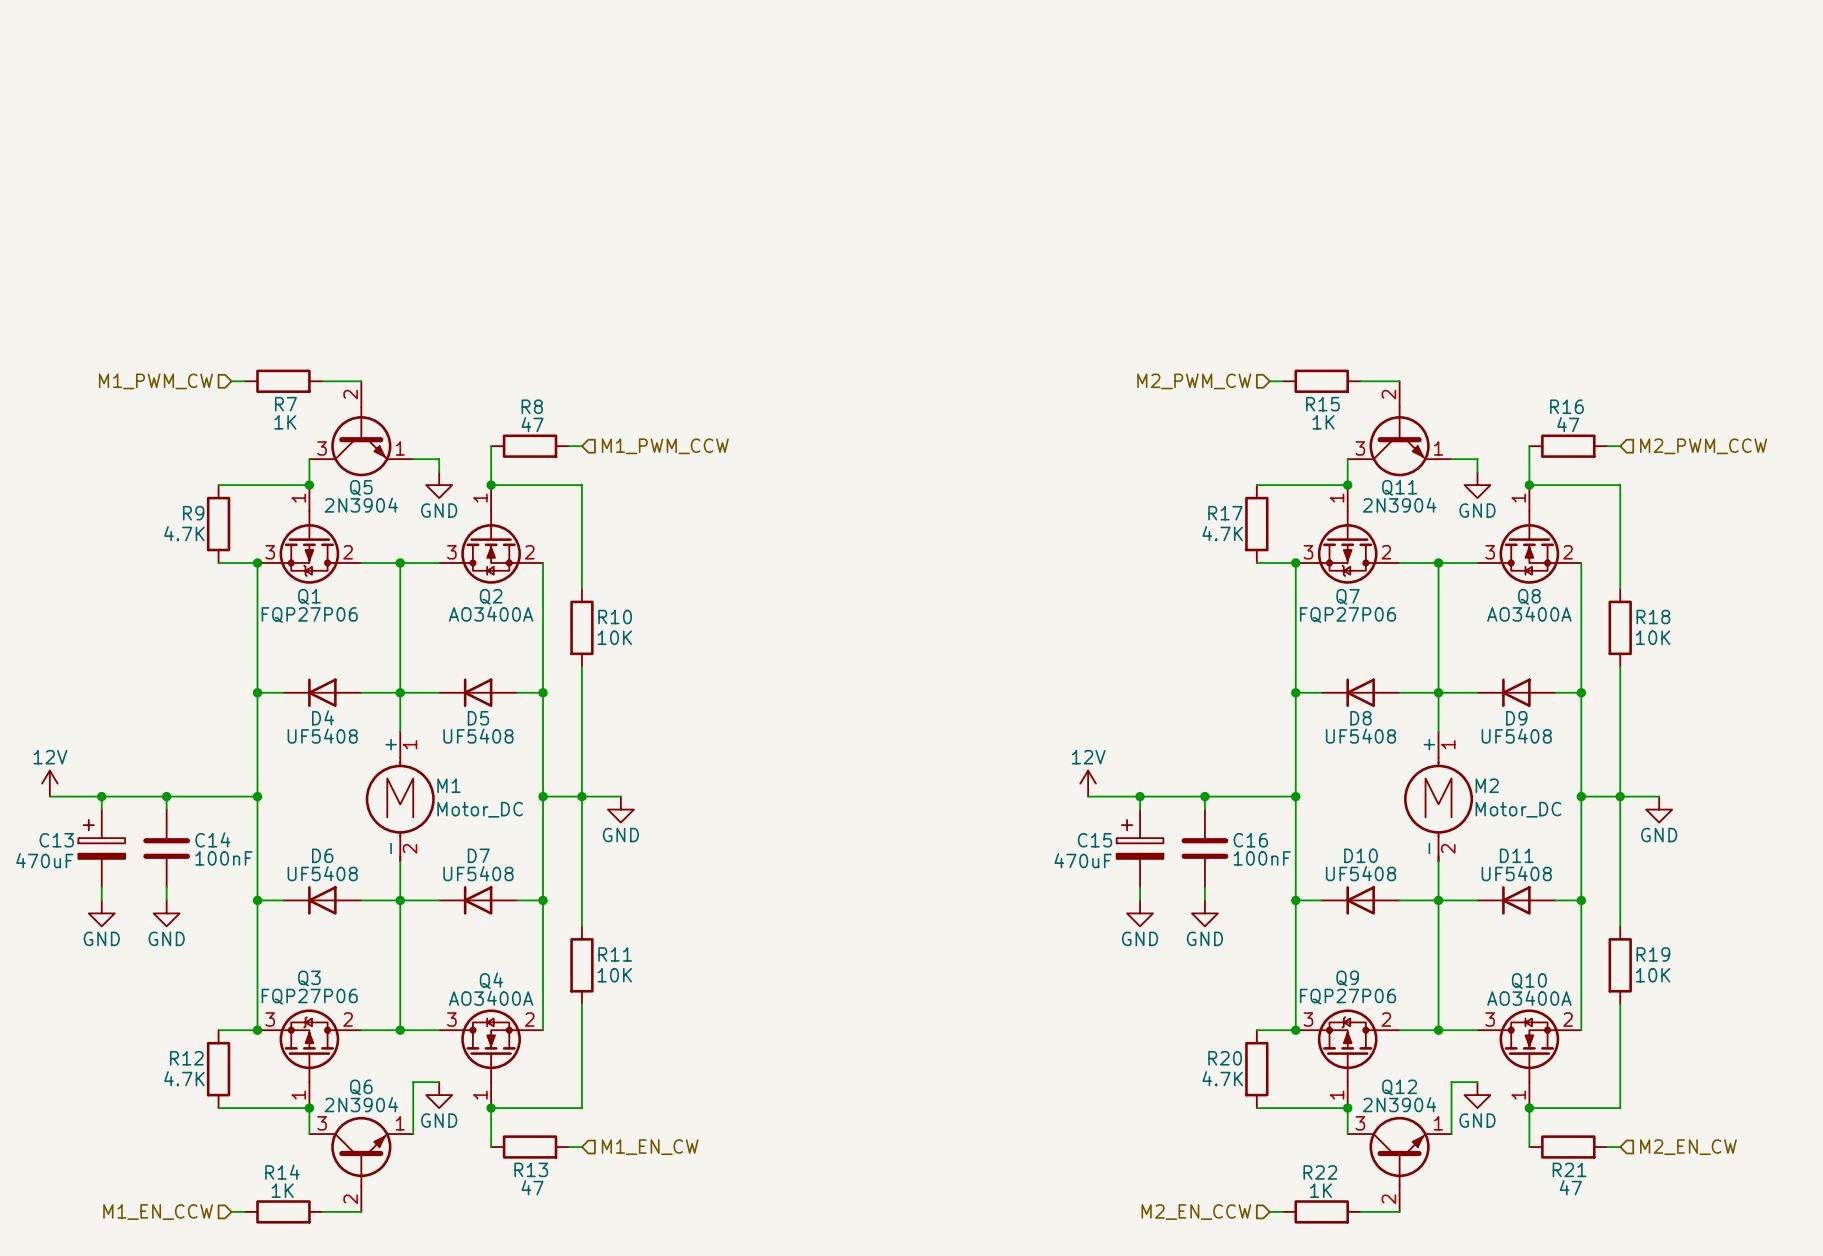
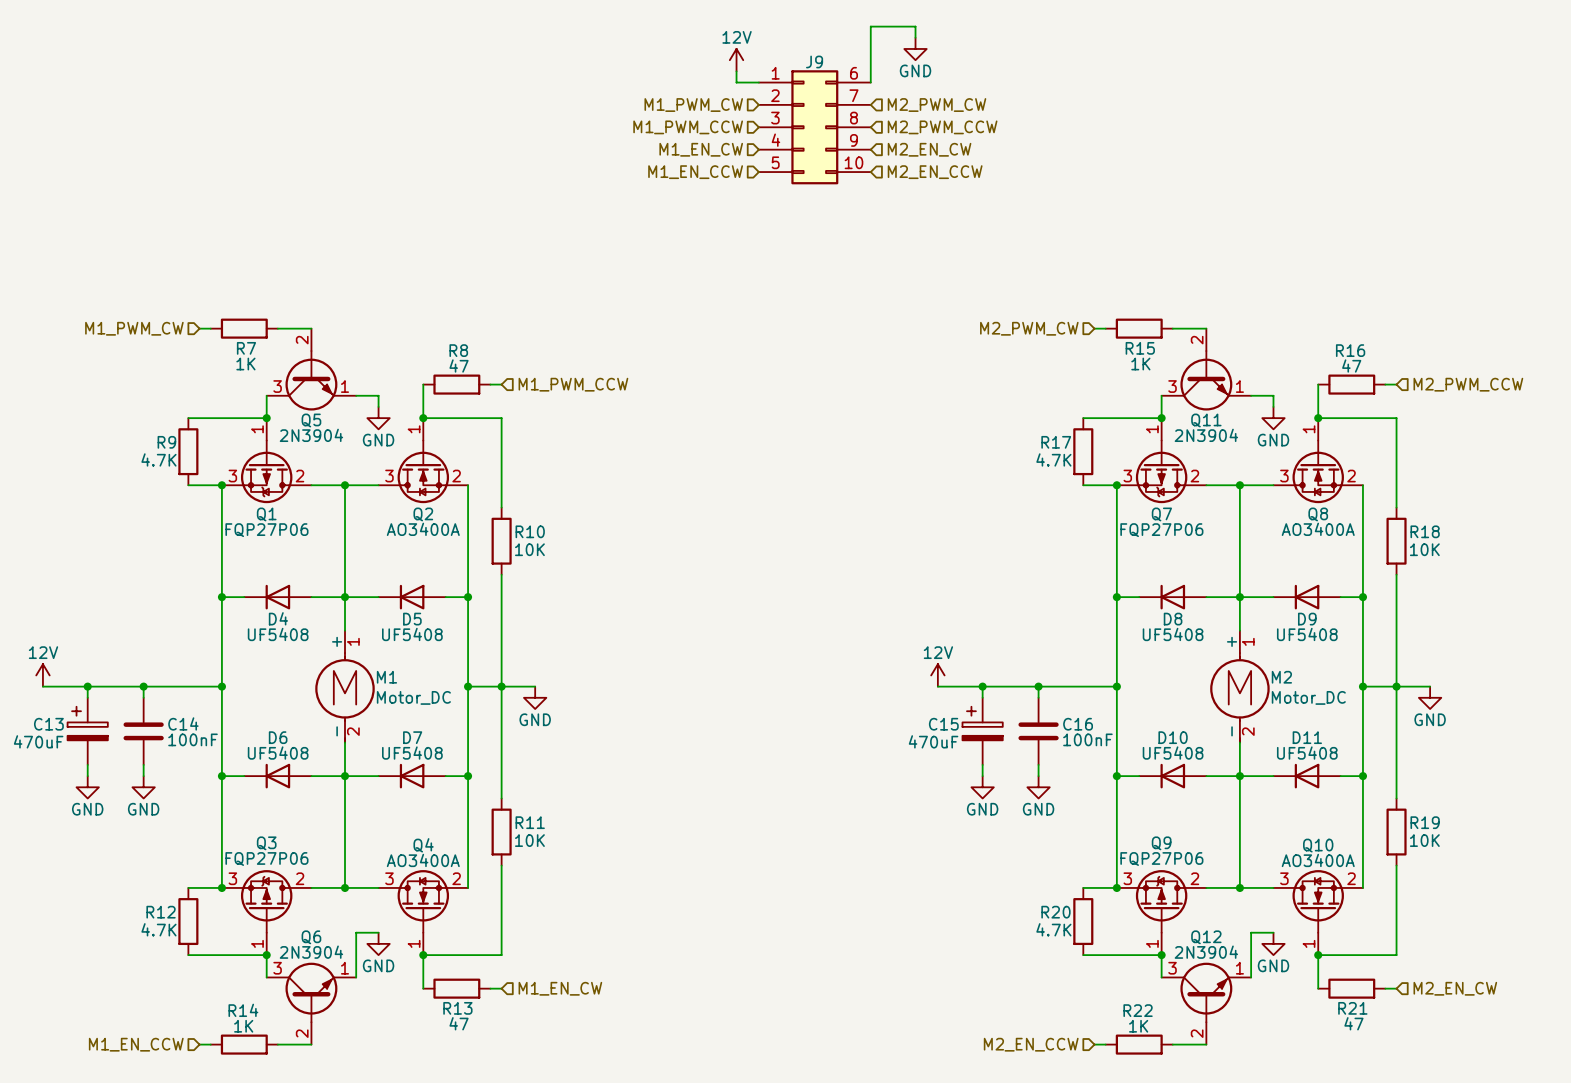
wire: none -> (915, 37) (915, 26) (870, 26) (870, 82)
power symbol: none -> GND (915, 48)
power symbol: none -> 12V (736, 60)
wire: none -> (736, 71) (736, 82) (758, 82)
hierarchical label: none -> M1_PWM_CW (693, 105)
hierarchical label: none -> M2_PWM_CW (936, 105)
hierarchical label: none -> M1_PWM_CCW (688, 127)
J9: none -> (814, 127)
hierarchical label: none -> M2_PWM_CCW (942, 127)
hierarchical label: none -> M1_EN_CW (701, 149)
hierarchical label: none -> M2_EN_CW (929, 149)
hierarchical label: none -> M1_EN_CCW (695, 172)
hierarchical label: none -> M2_EN_CCW (935, 172)

